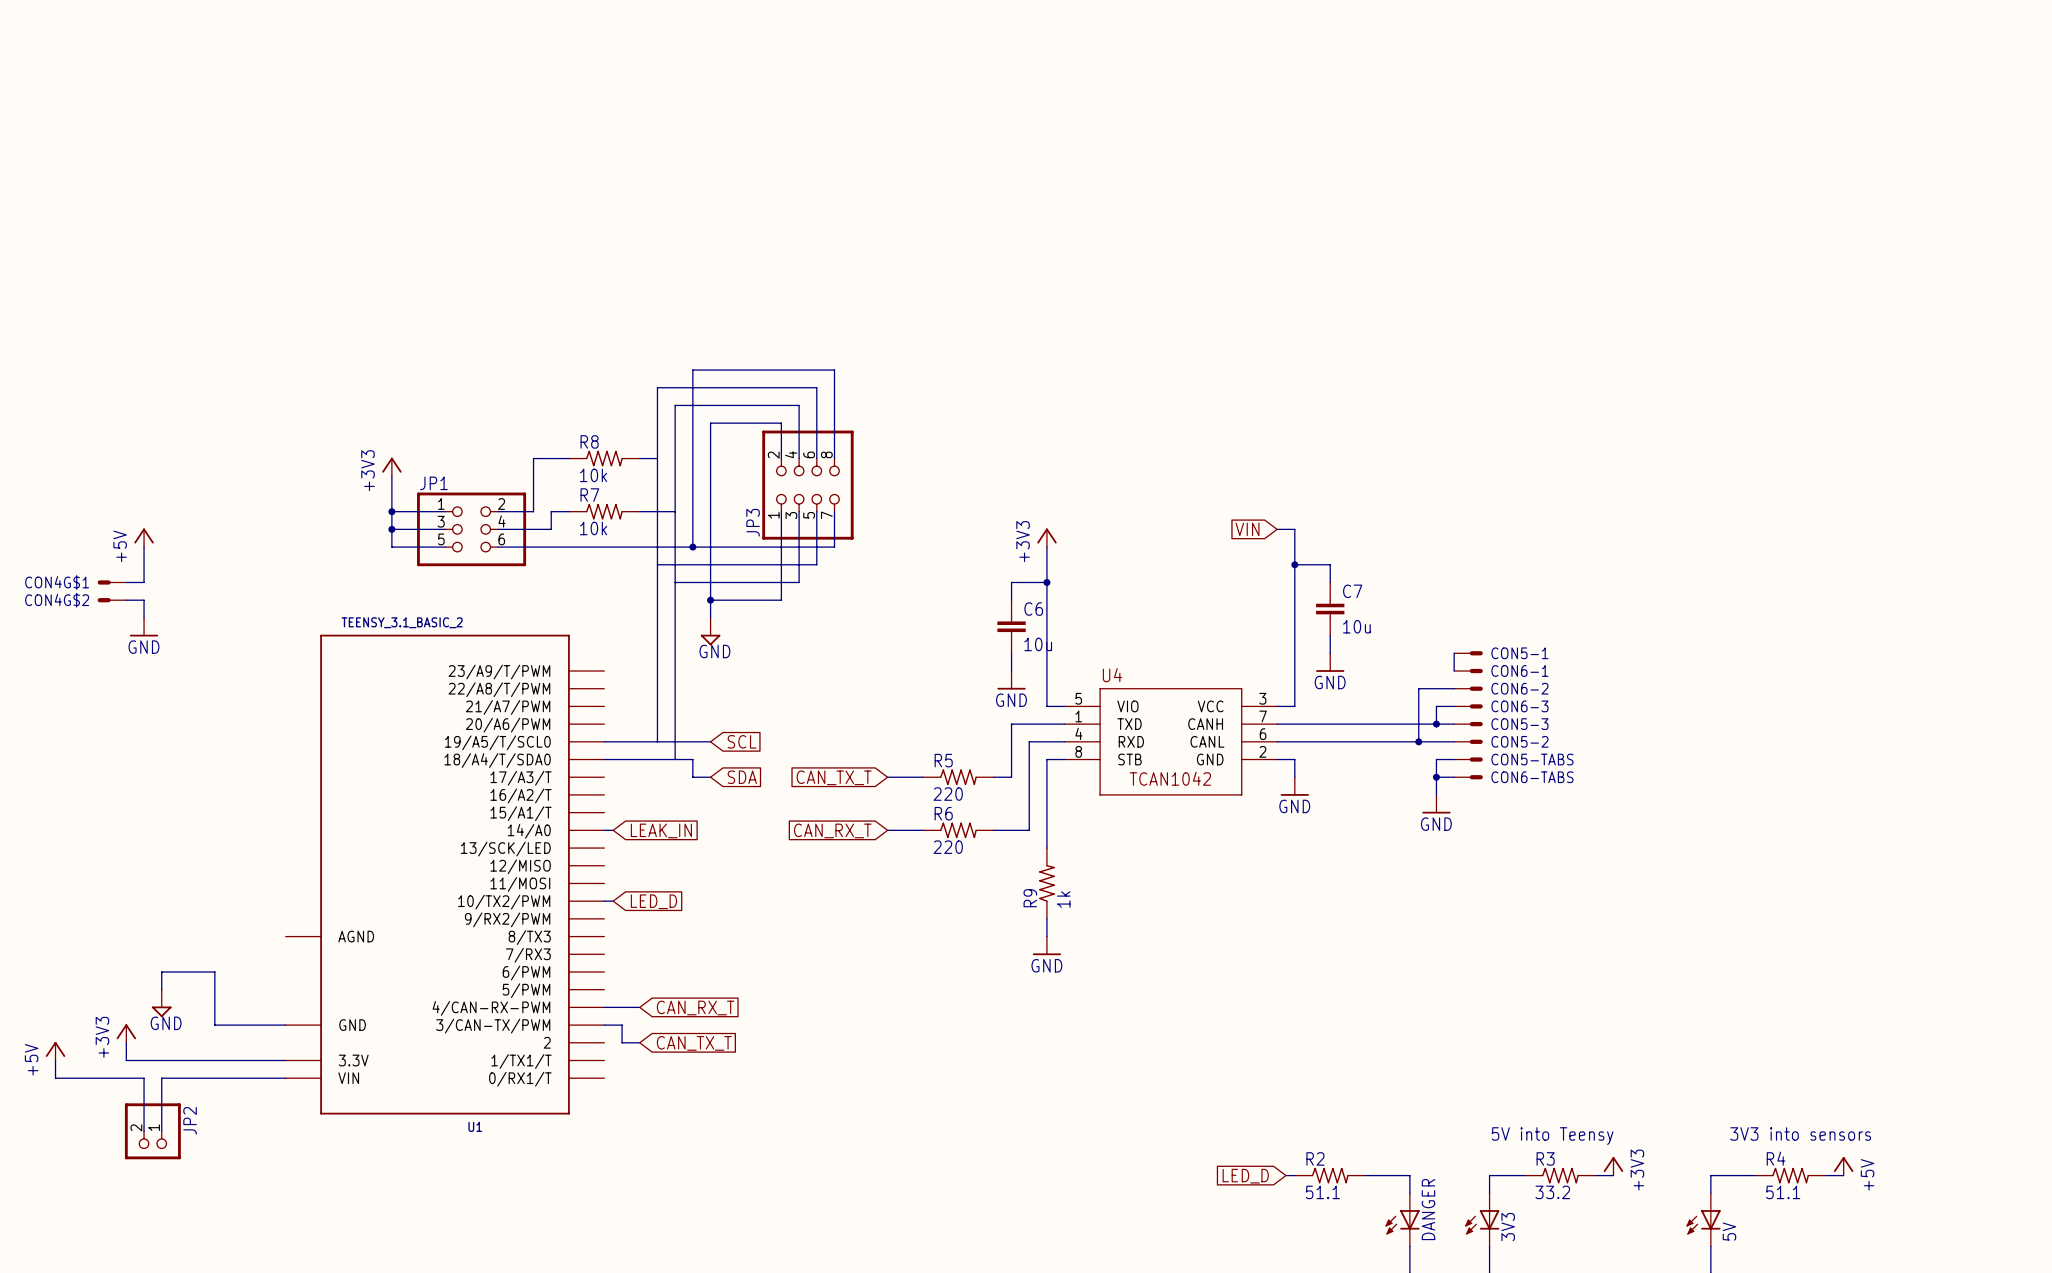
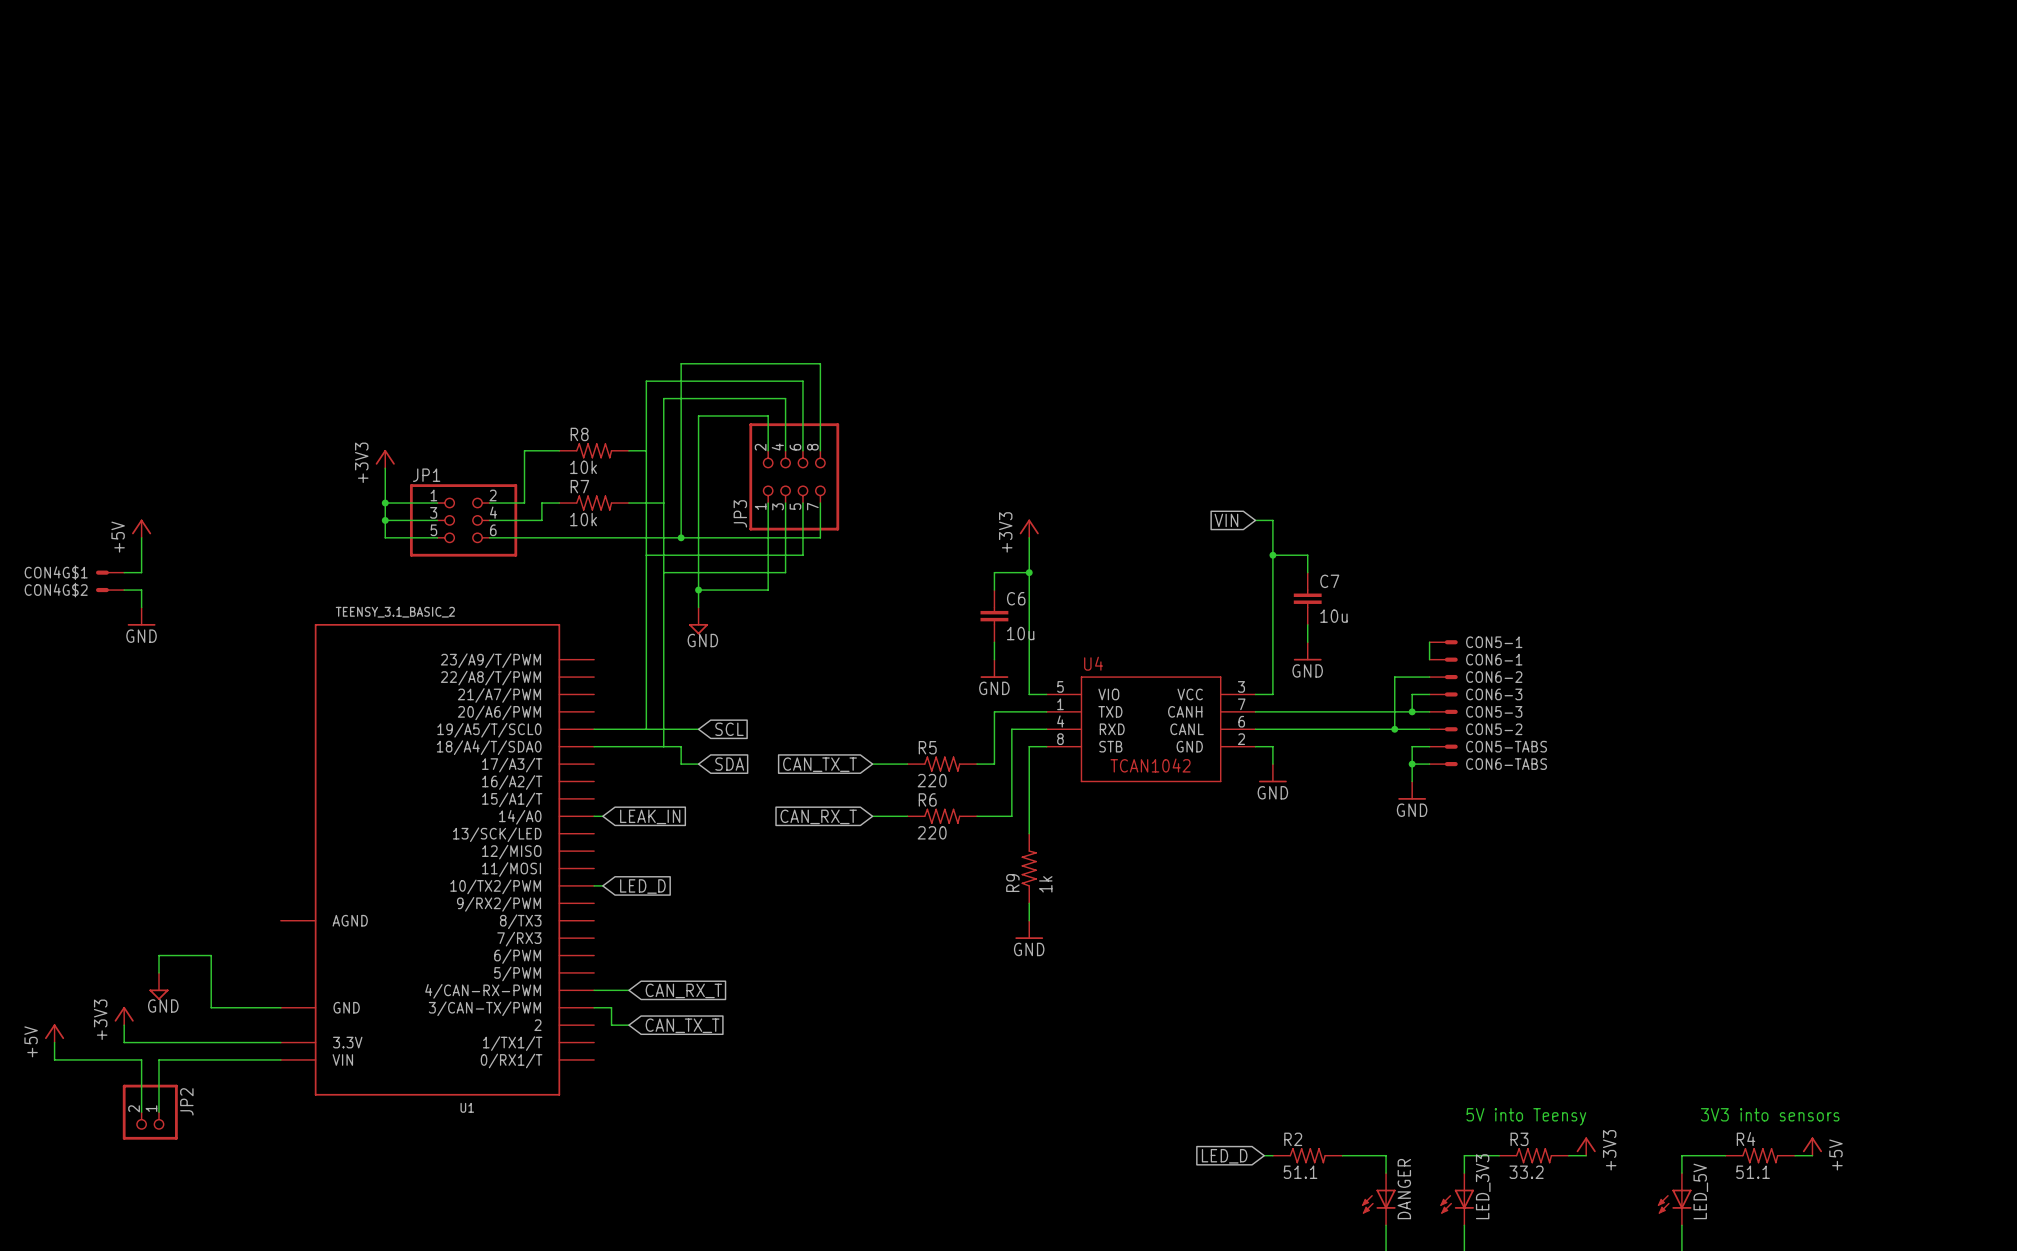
3V3 name: 3V3 (1508, 1227) -> LED_3V3 (1483, 1186)
5V name: 5V (1729, 1231) -> LED_5V (1700, 1191)

